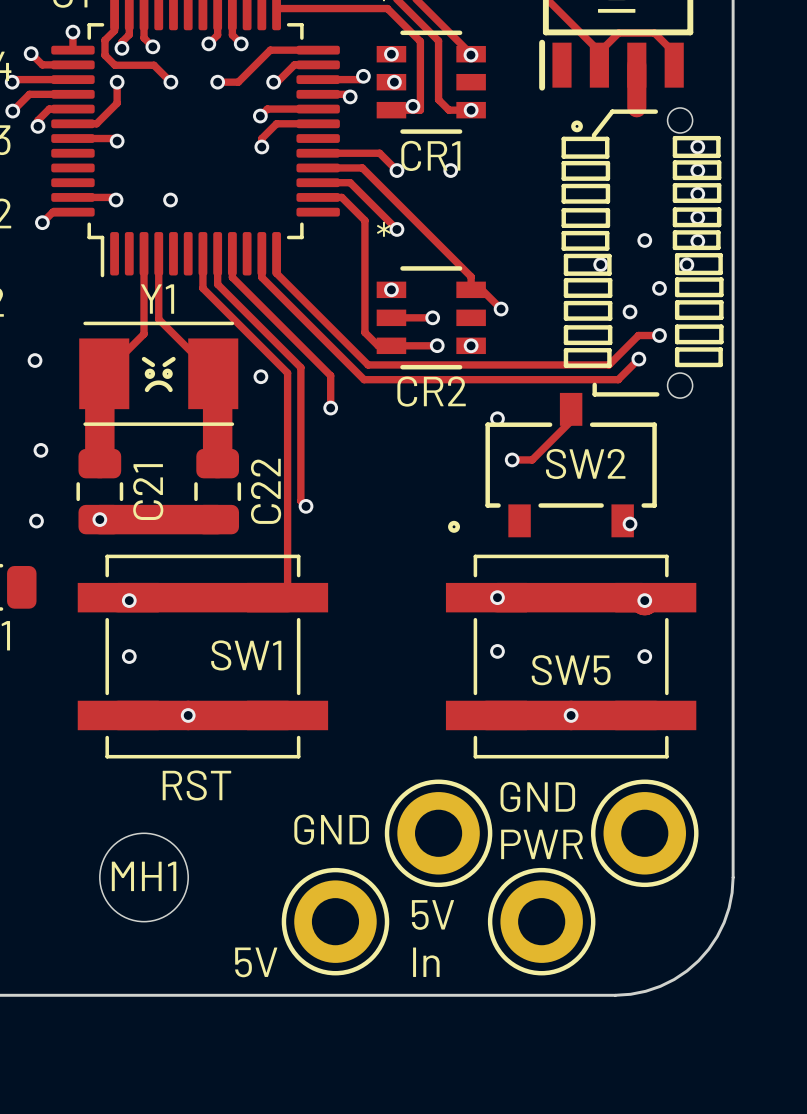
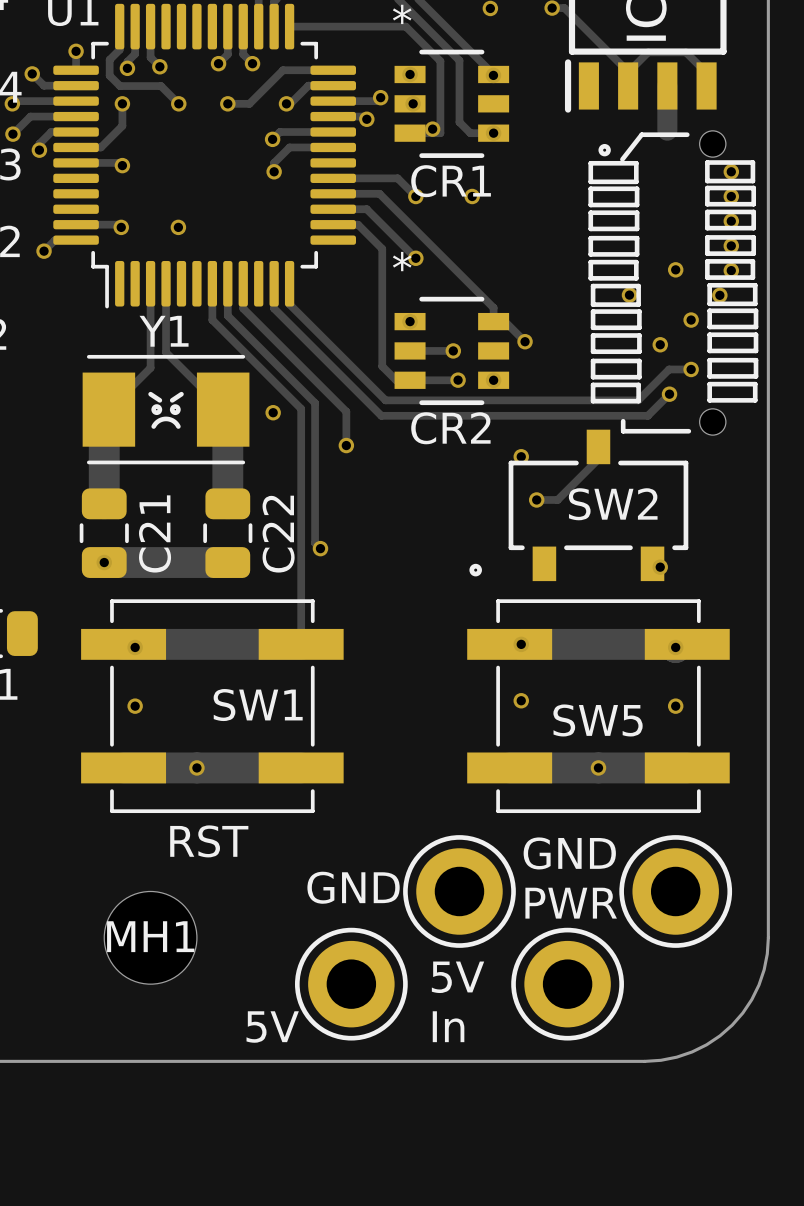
via: (35, 360) -> none
via: (40, 450) -> none
via: (36, 521) -> none

